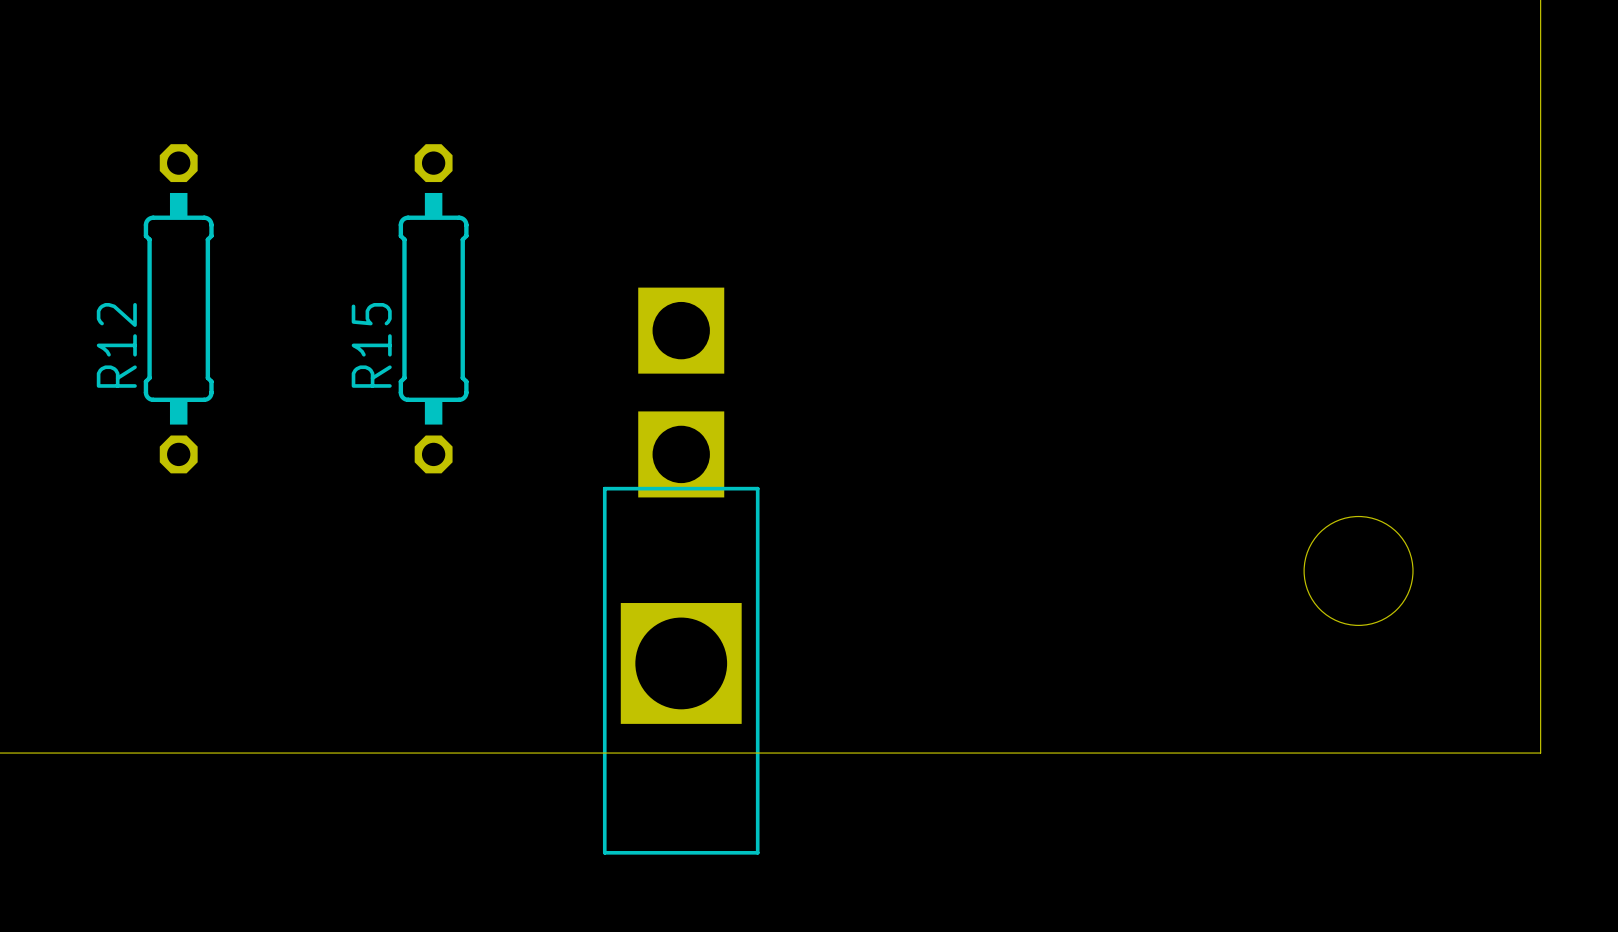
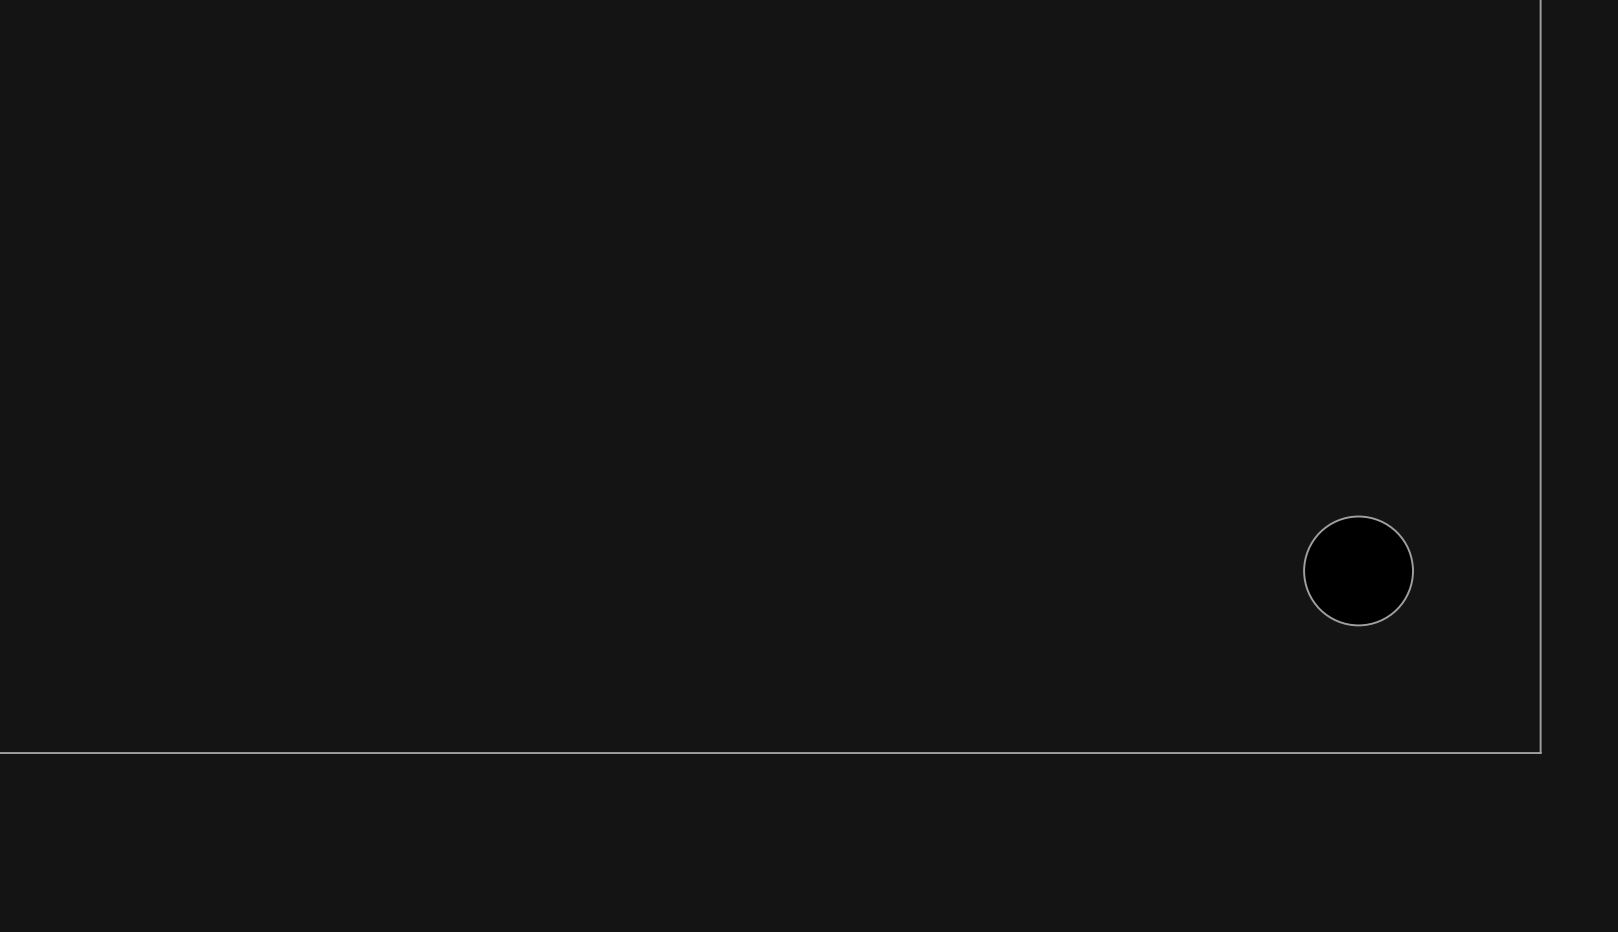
R12: (178, 308) -> none
R15: (433, 308) -> none
part: (681, 571) -> none

